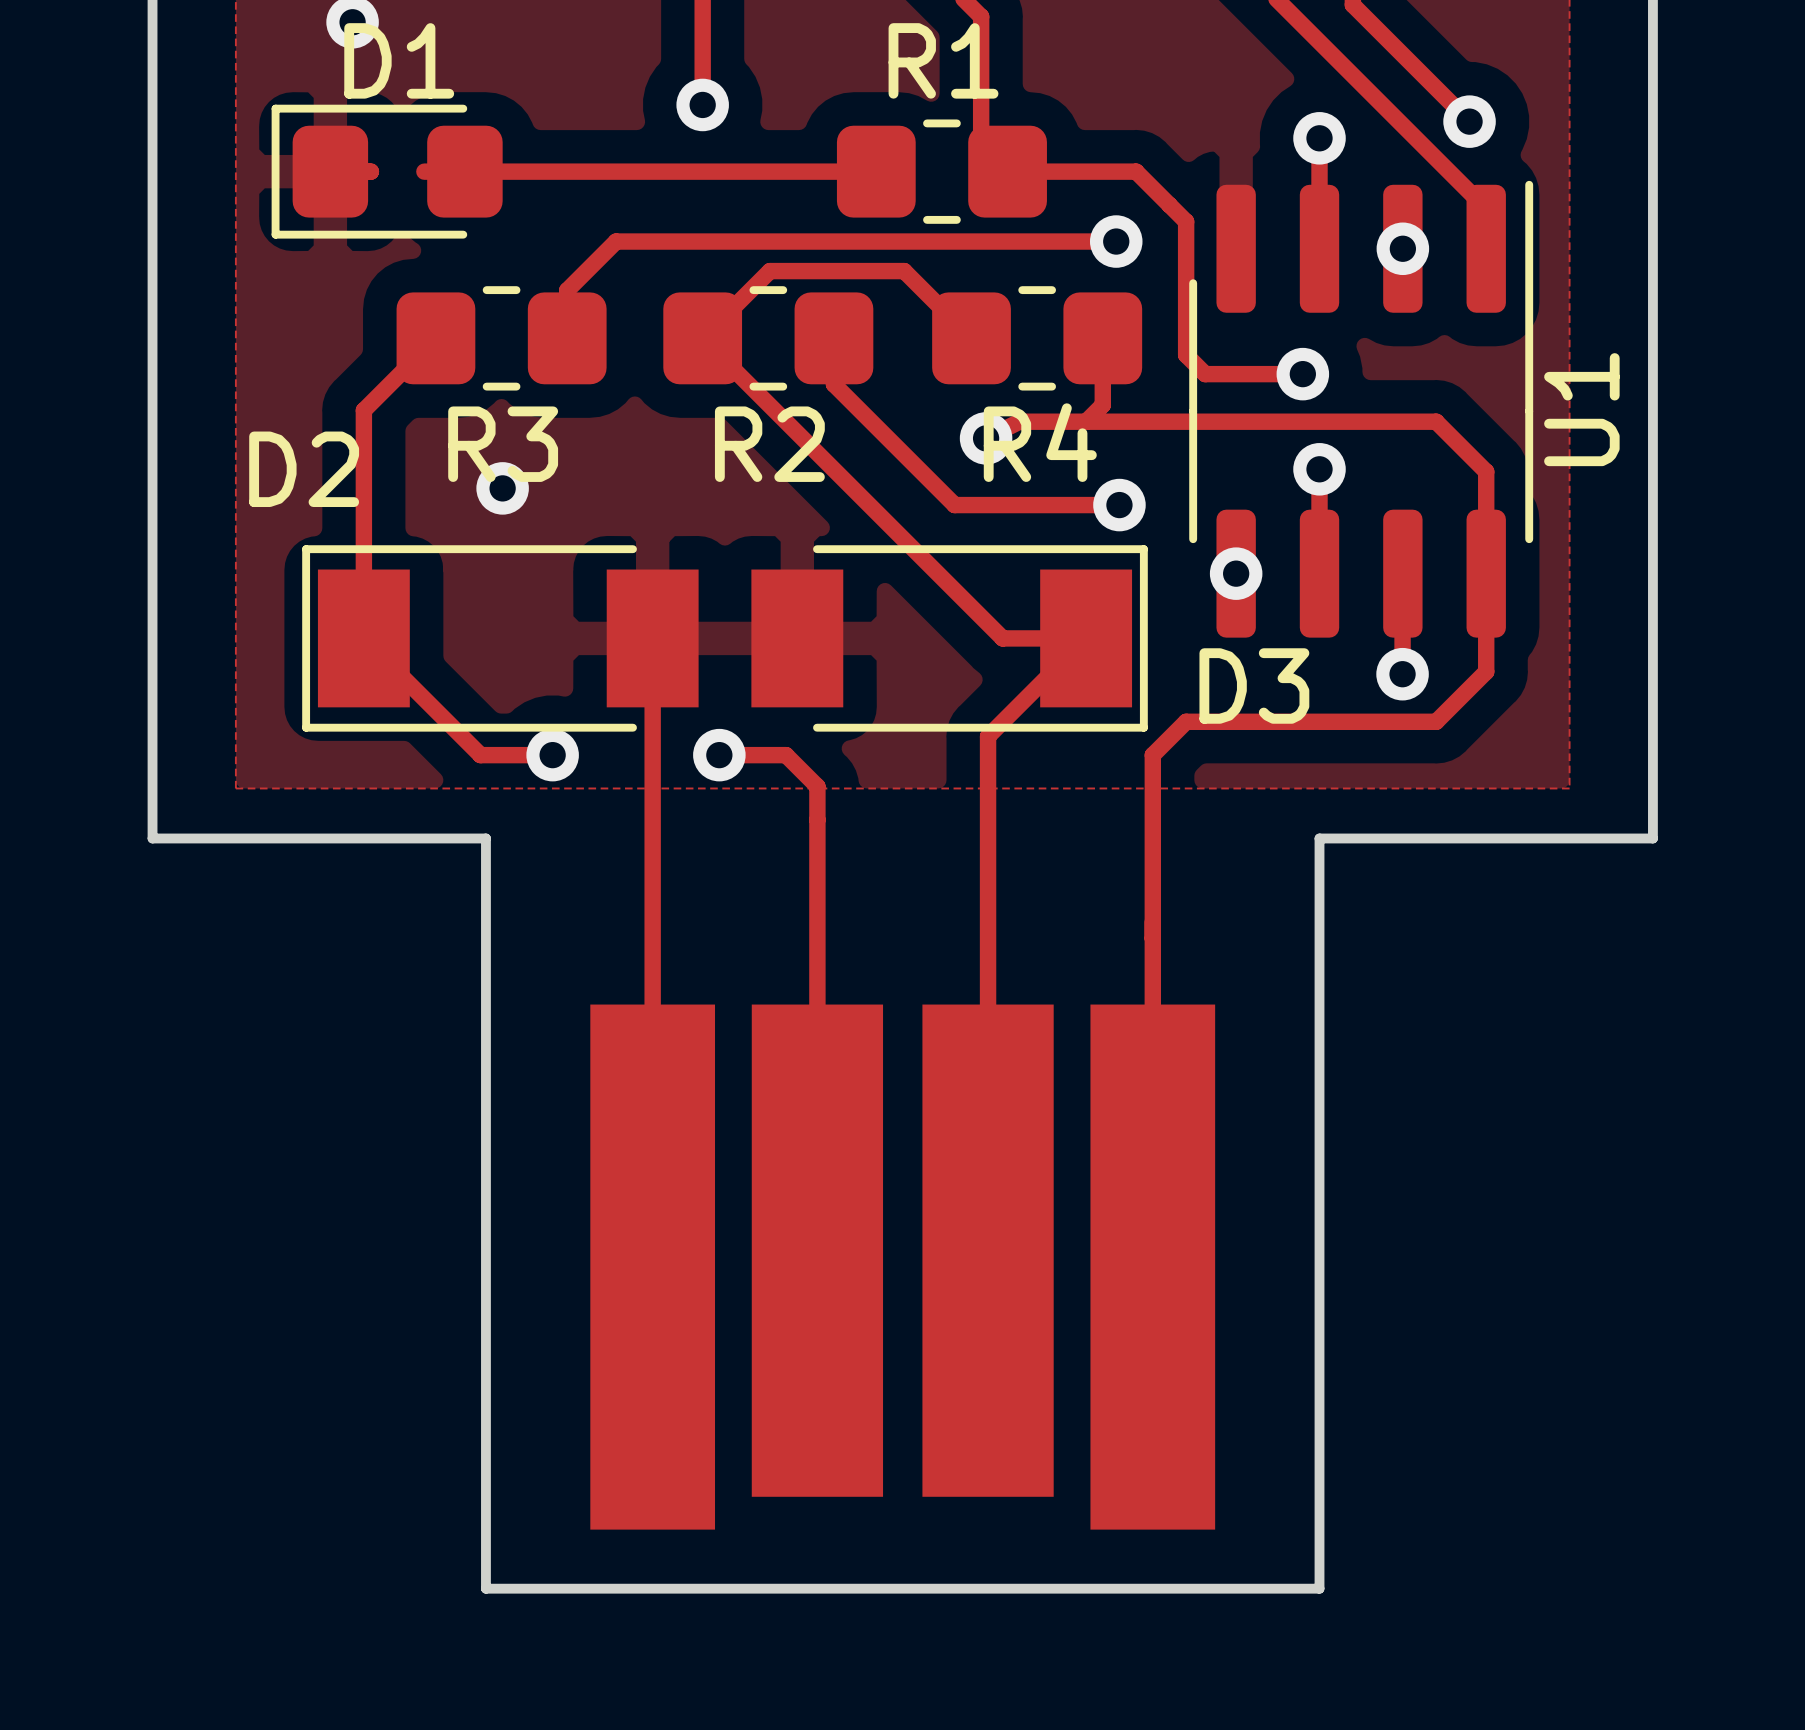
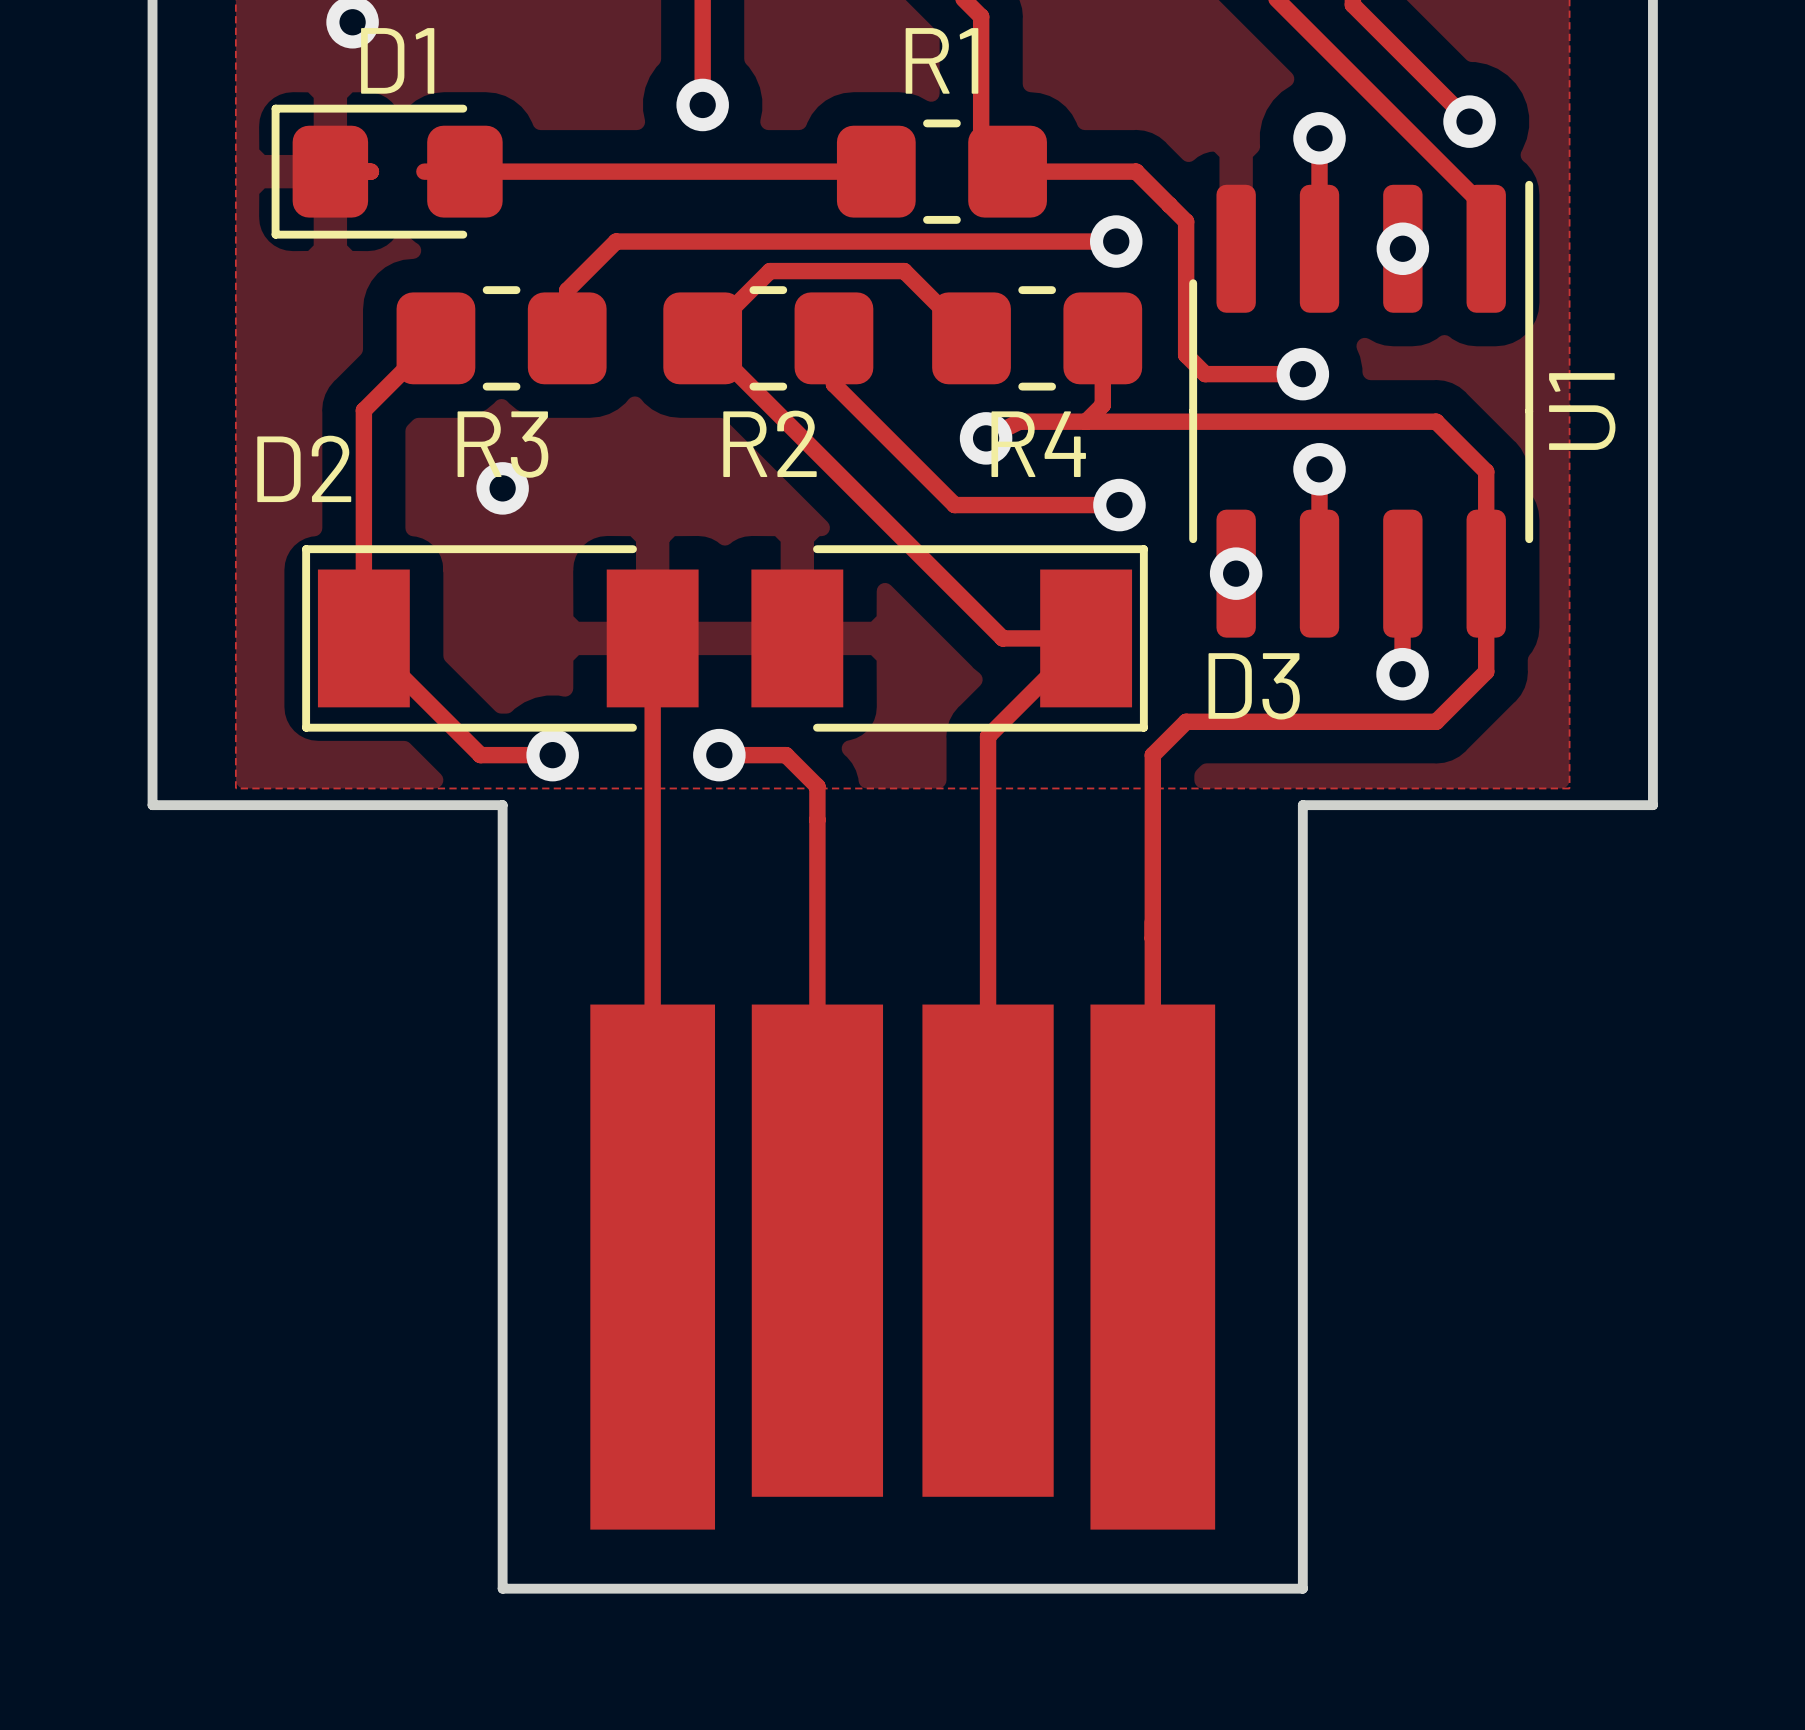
board edge: (152, 805) (152, 838) (485, 838) (485, 1588) (502, 1588) -> (152, 805) (502, 805) (502, 1588)
board edge: (1652, 805) (1652, 838) (1319, 838) (1319, 1588) (1302, 1588) -> (1652, 805) (1302, 805) (1302, 1588)

